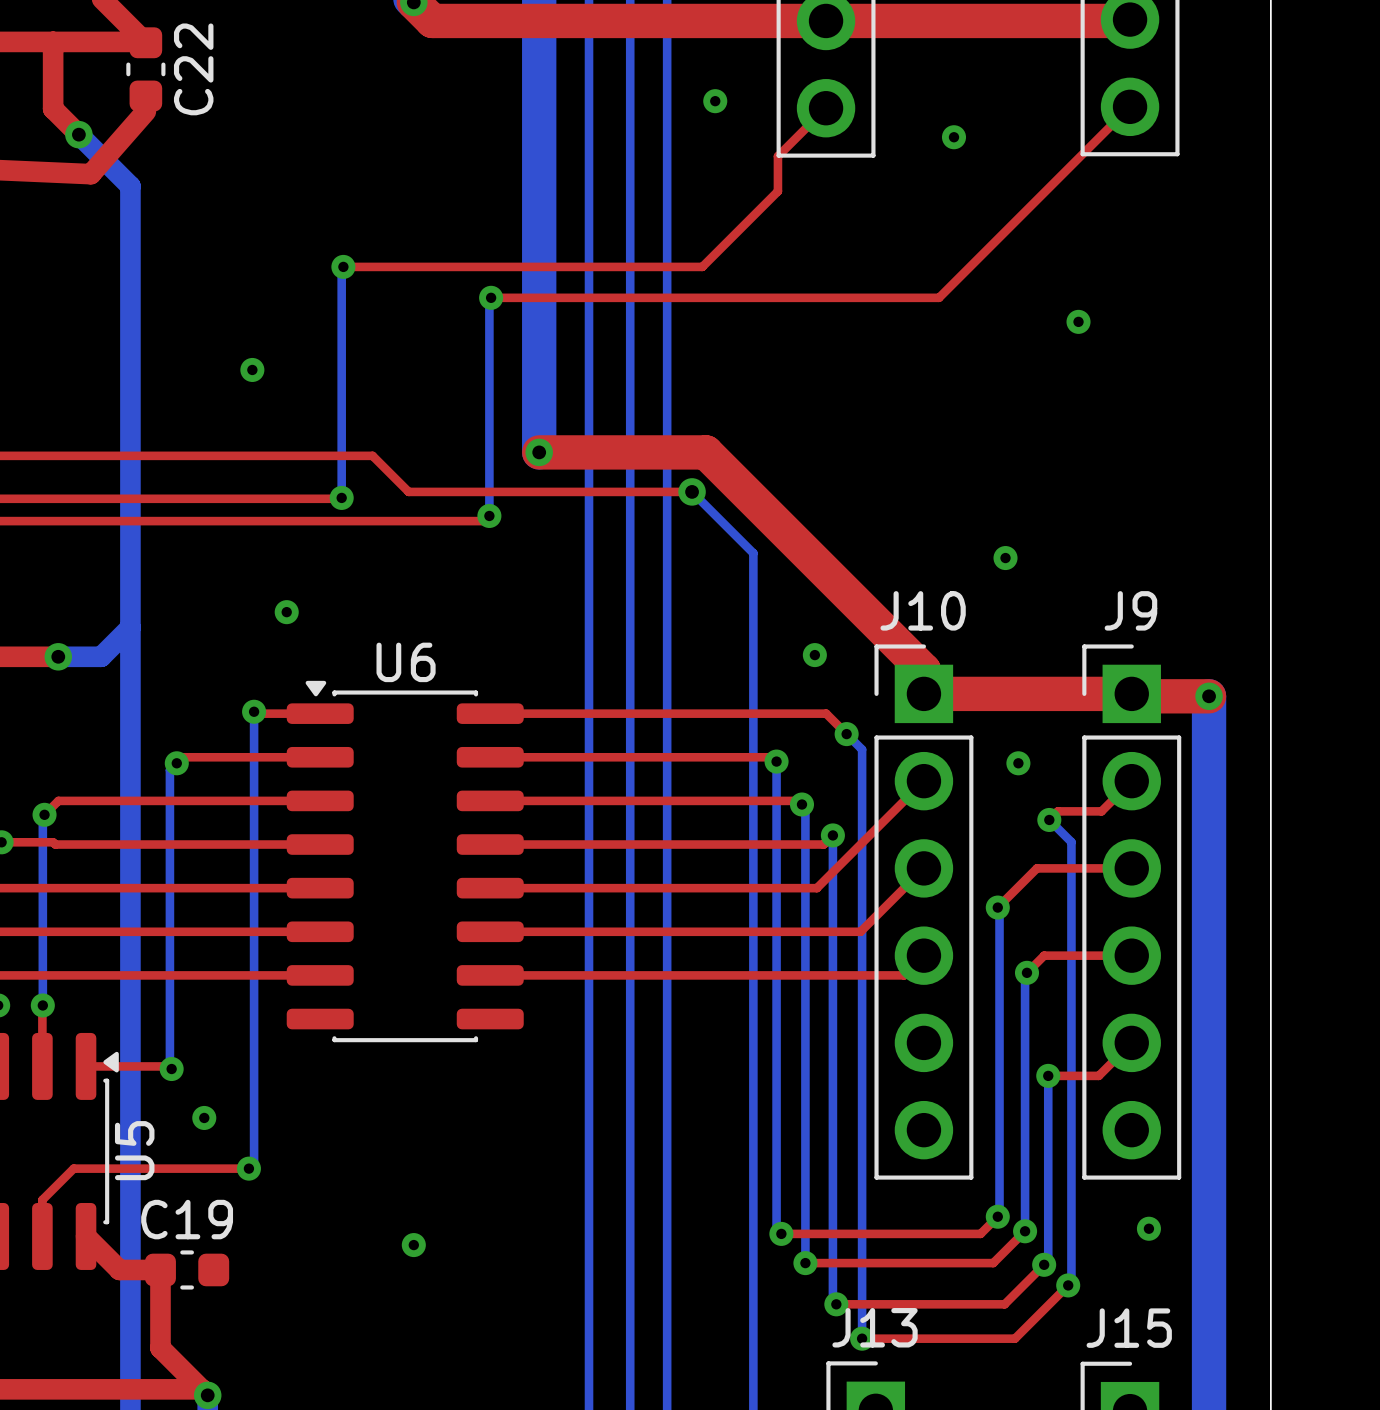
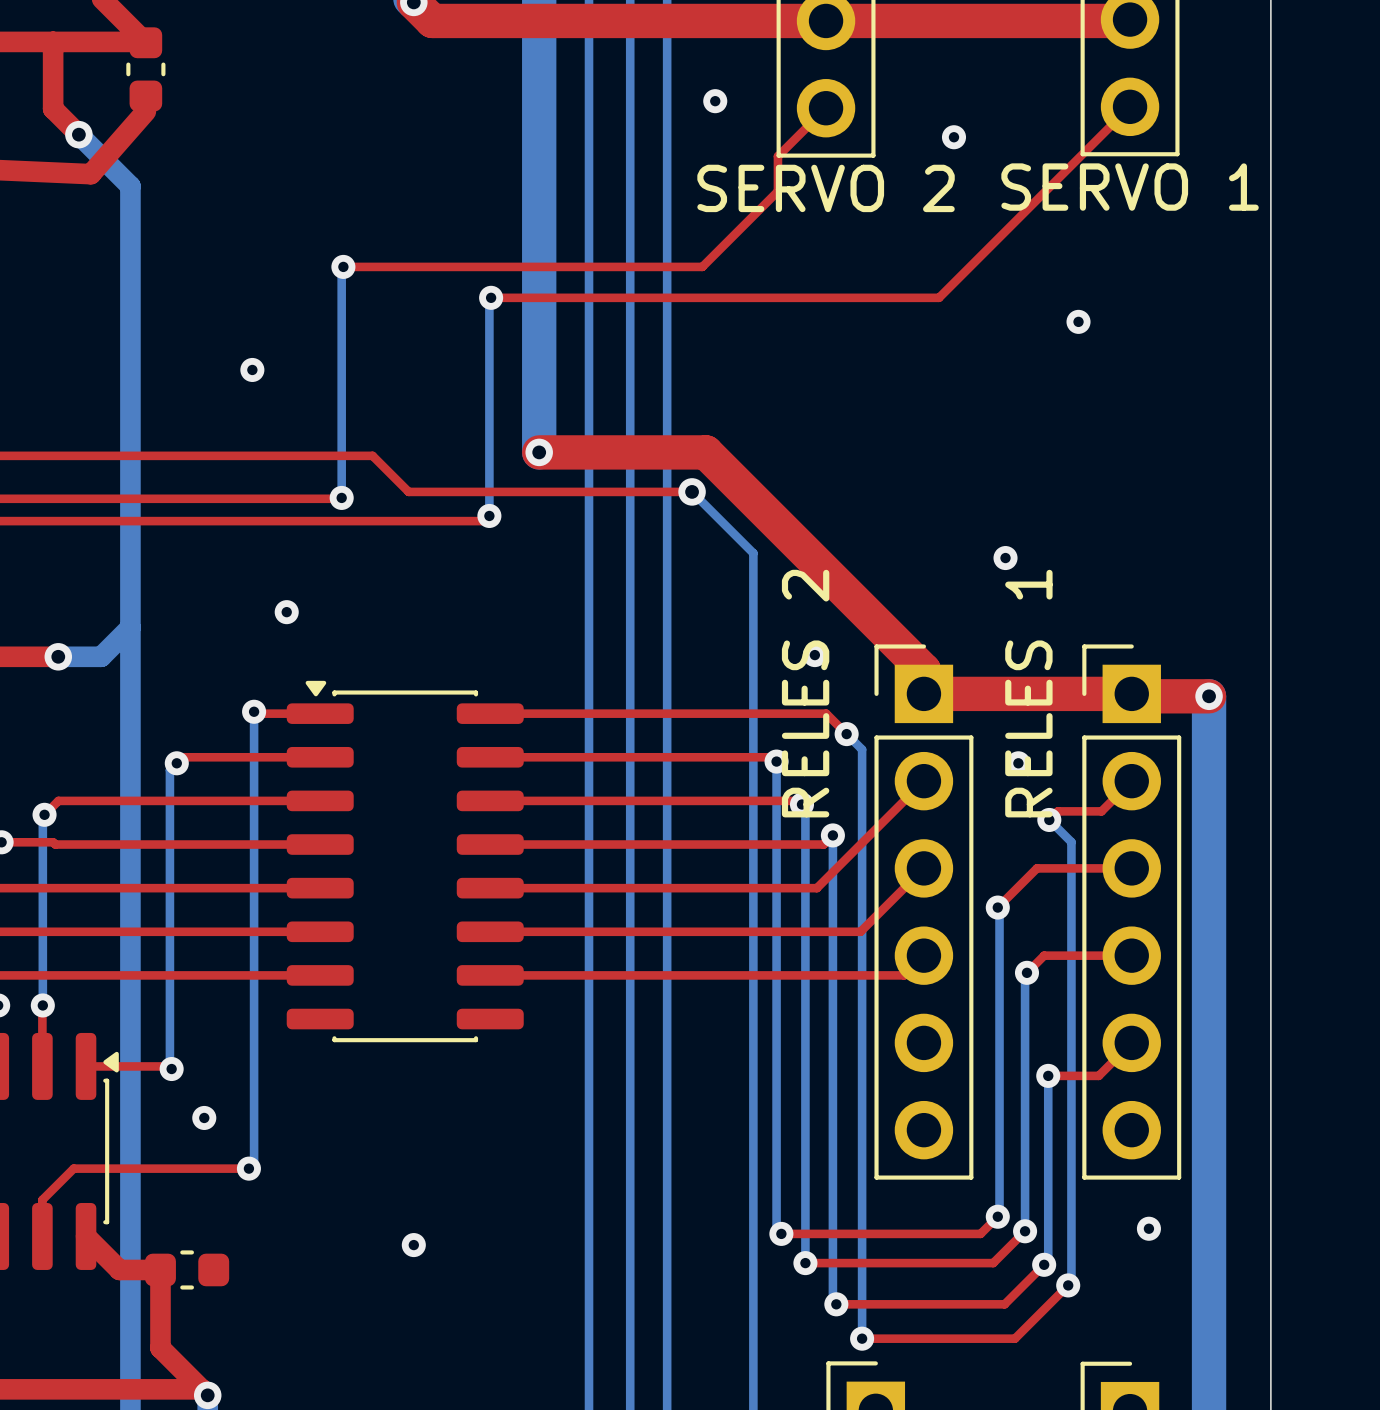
C22 name: C22 (193, 69) -> none
text: none -> SERVO 1 (1130, 187)
text: none -> SERVO 2 (826, 188)
J10 name: J10 (923, 610) -> none
J9 name: J9 (1130, 610) -> none
U6 name: U6 (406, 662) -> none
text: none -> RELES 2 (805, 693)
text: none -> RELES 1 (1028, 693)
U5 name: U5 (134, 1150) -> none
C19 name: C19 (187, 1219) -> none
J13 name: J13 (875, 1327) -> none
J15 name: J15 (1129, 1328) -> none

